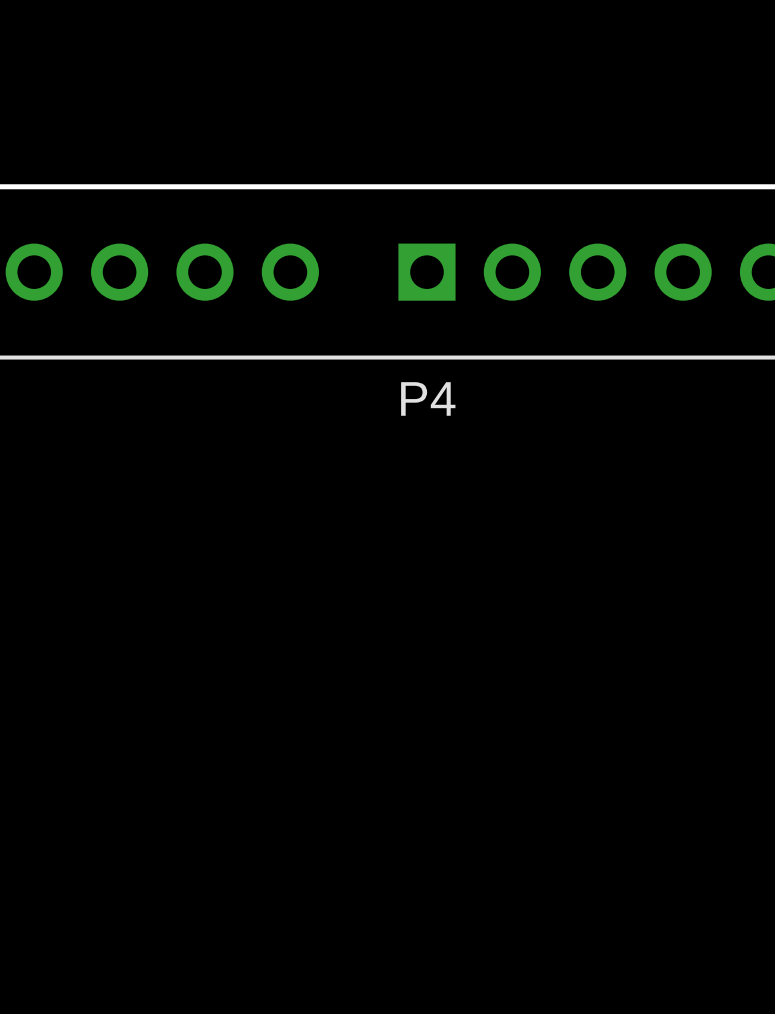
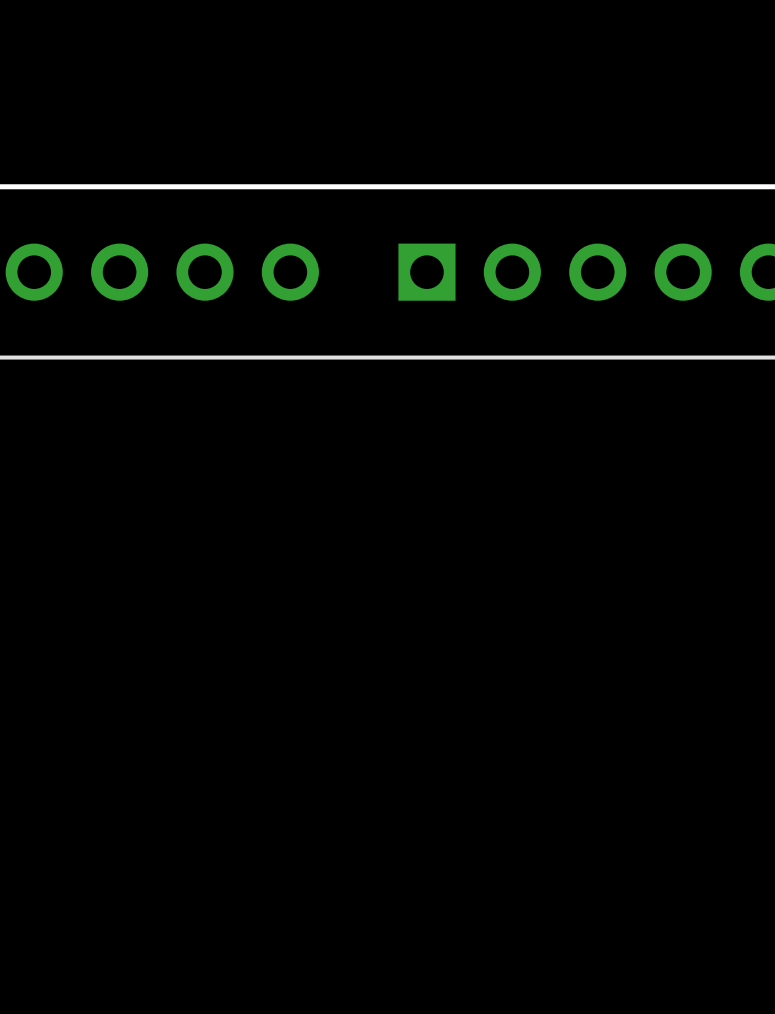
P4 name: P4 (428, 398) -> none

